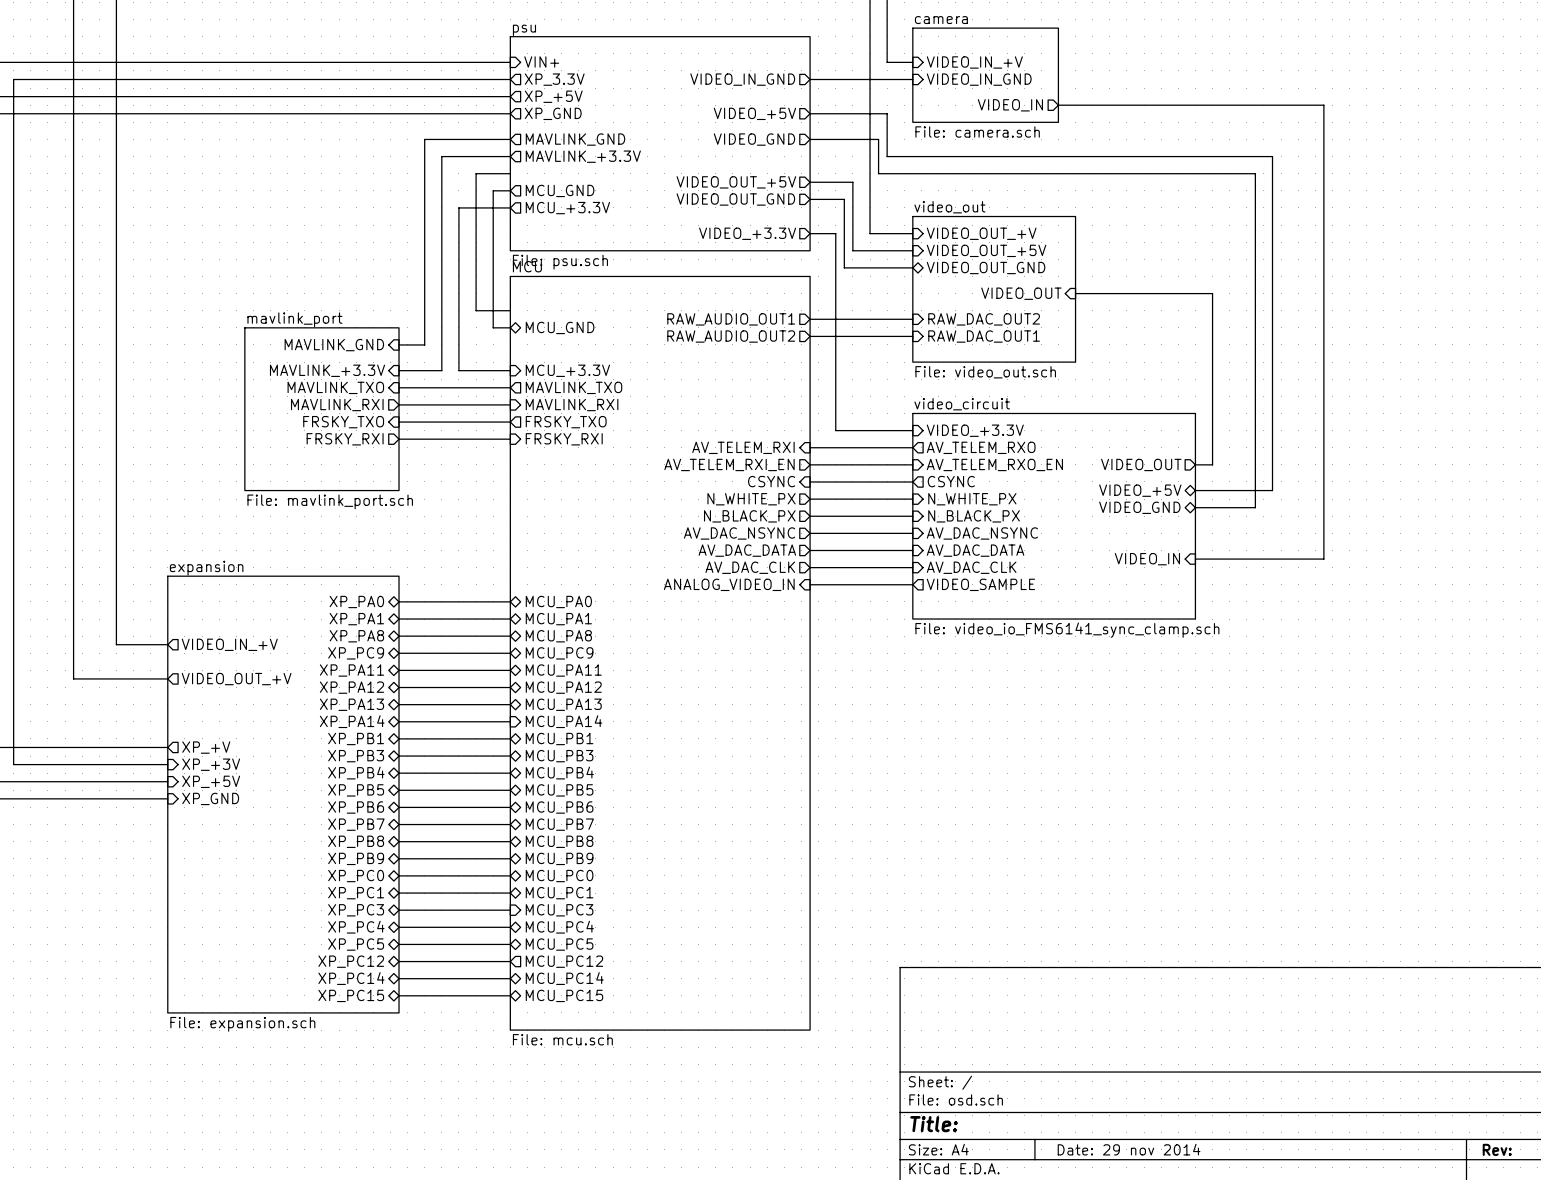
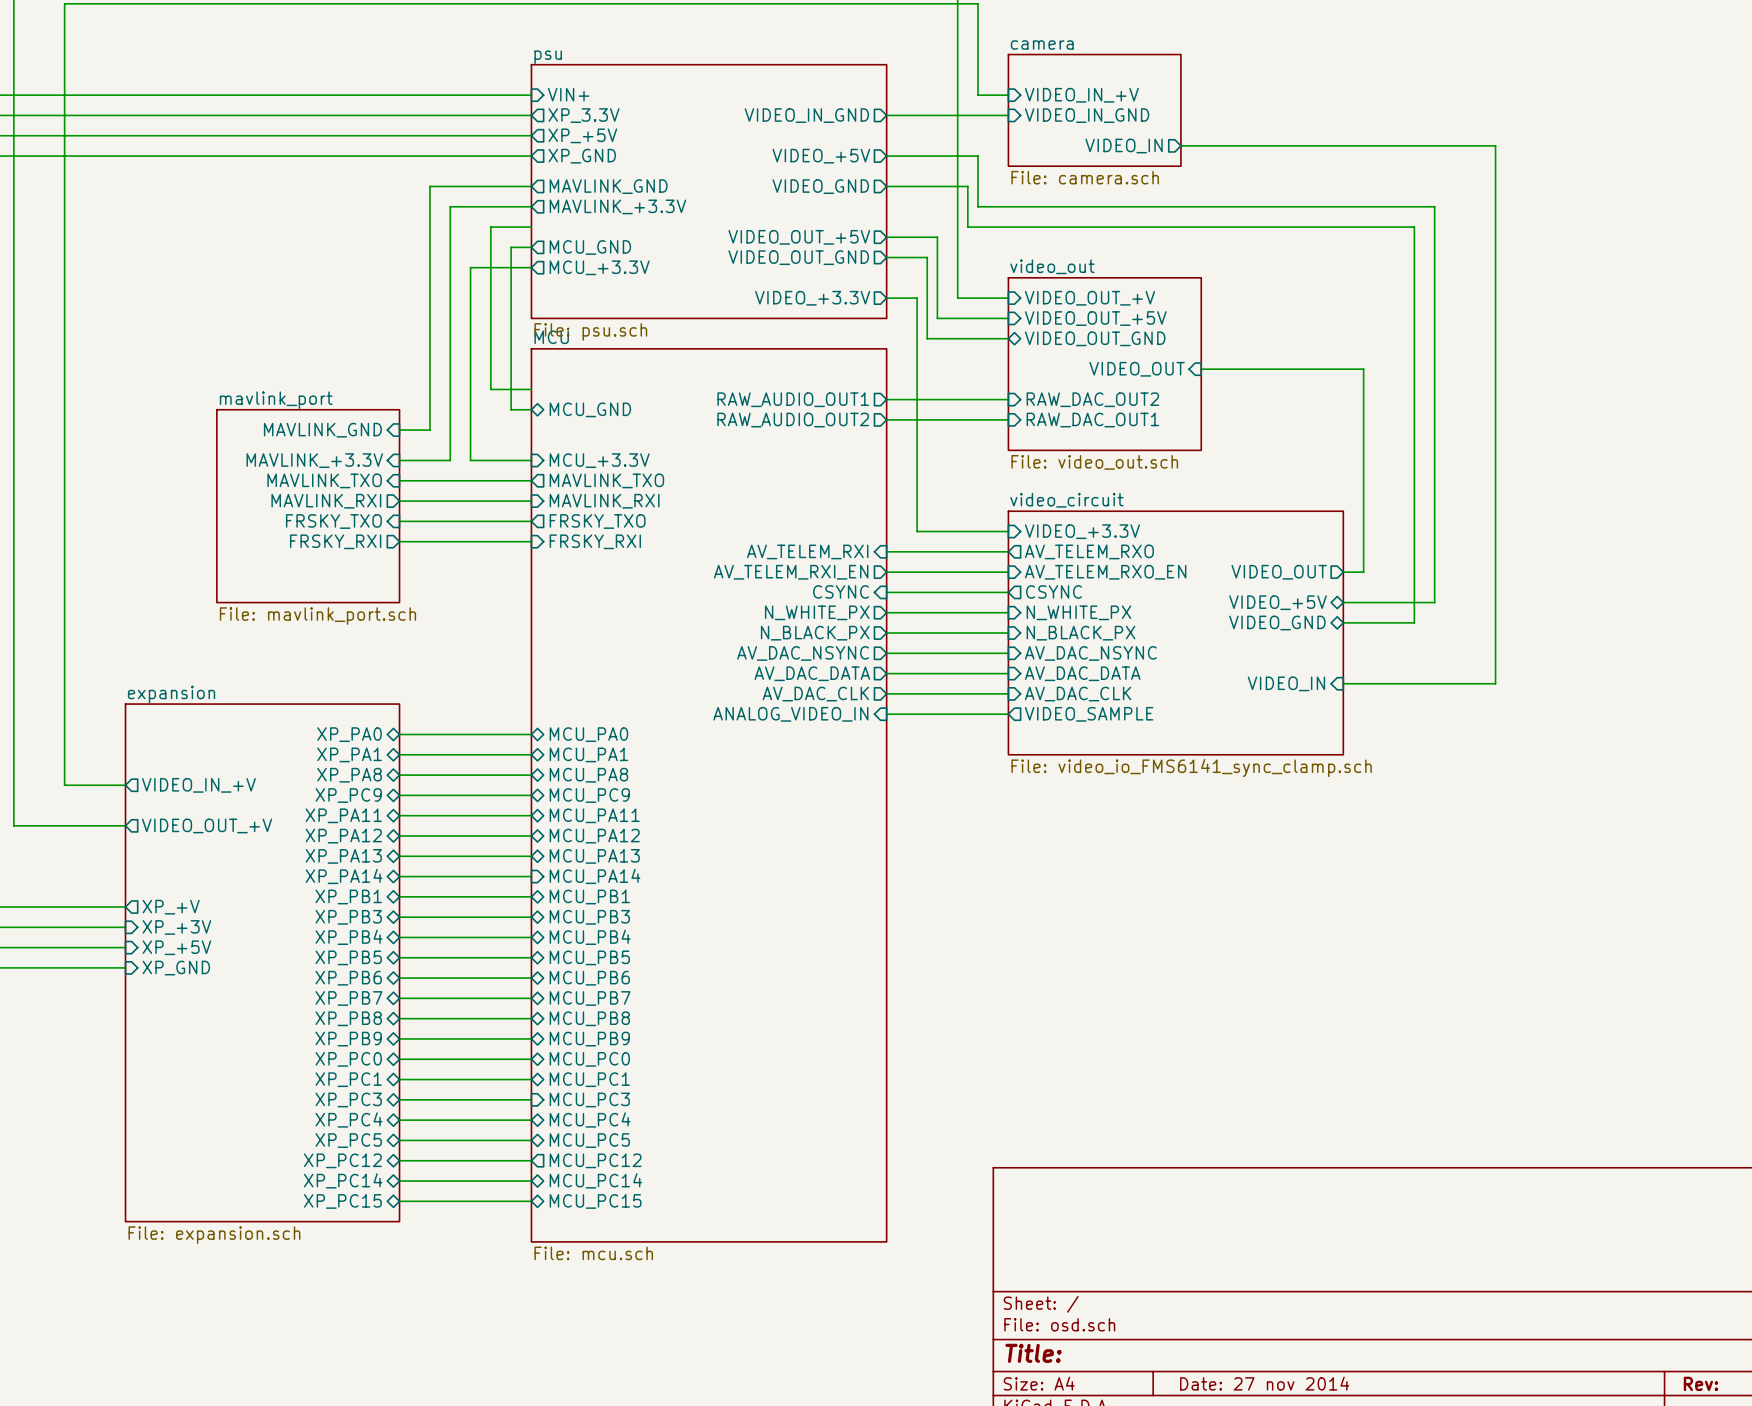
title block: Date: 29 nov 2014 (1129, 1149) -> Date: 27 nov 2014 (1264, 1383)

